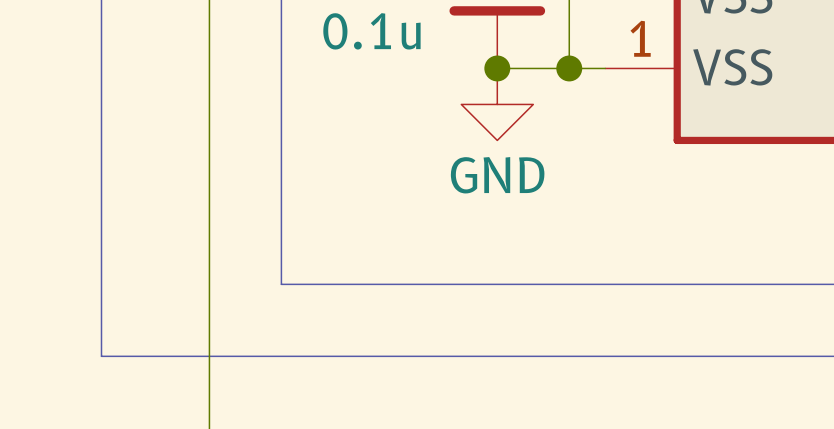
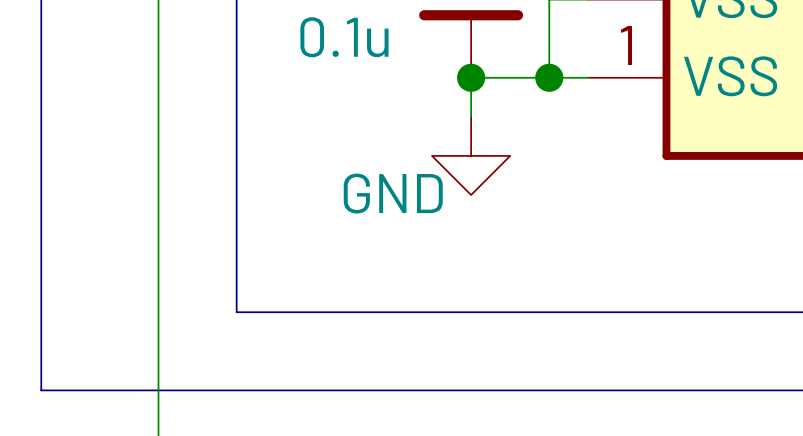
power symbol position: GND (497, 104) -> GND (471, 155)
power symbol text position: GND (497, 175) -> GND (393, 193)

